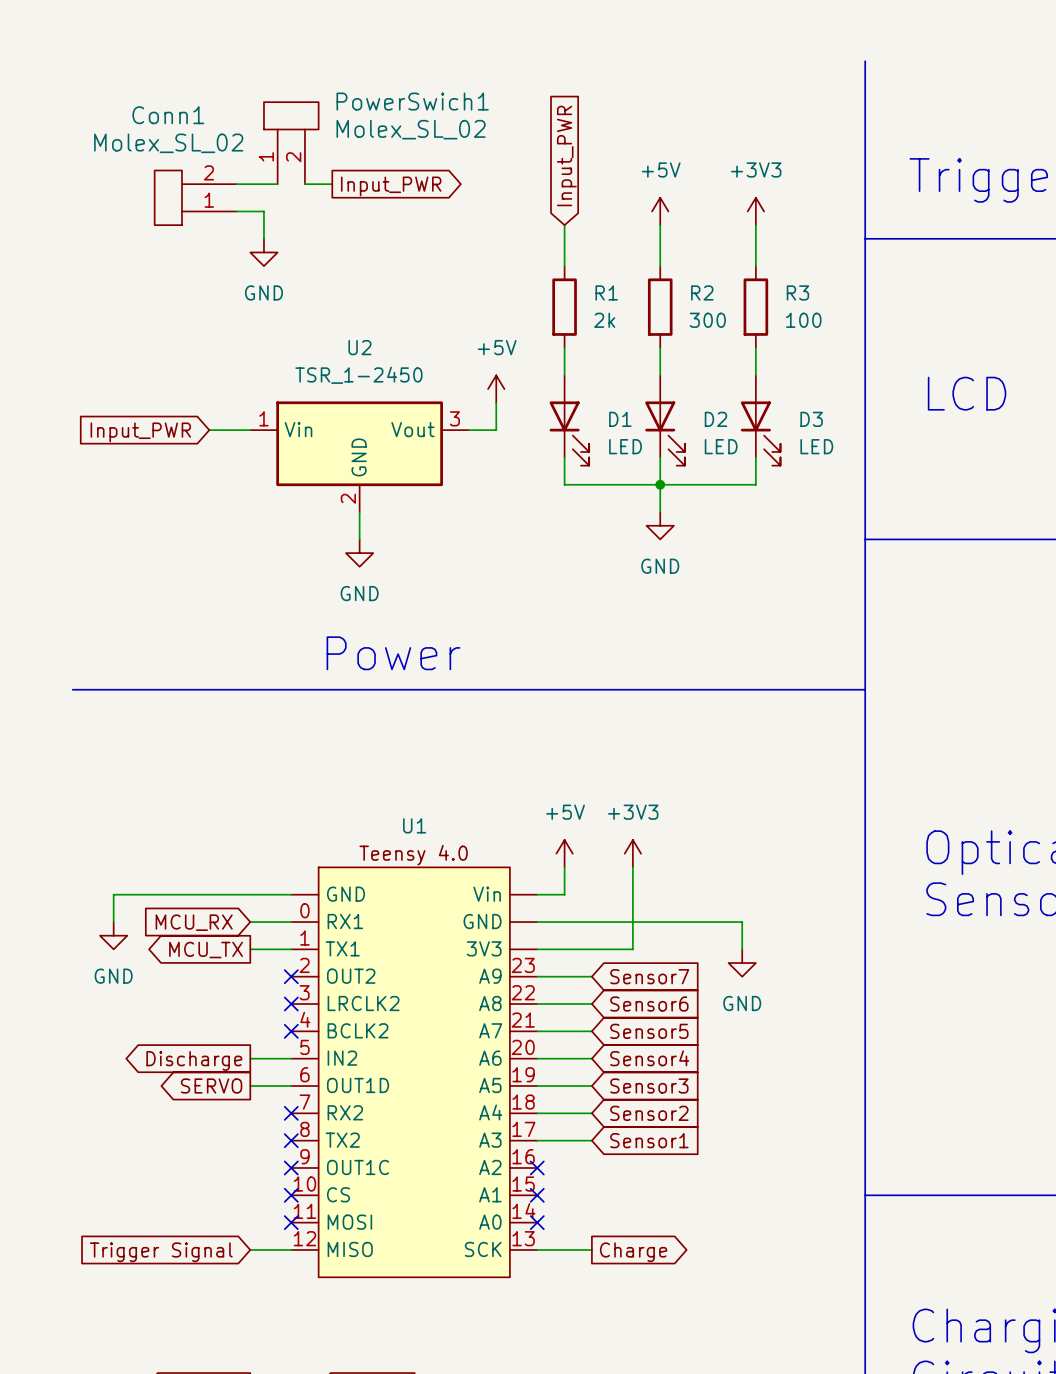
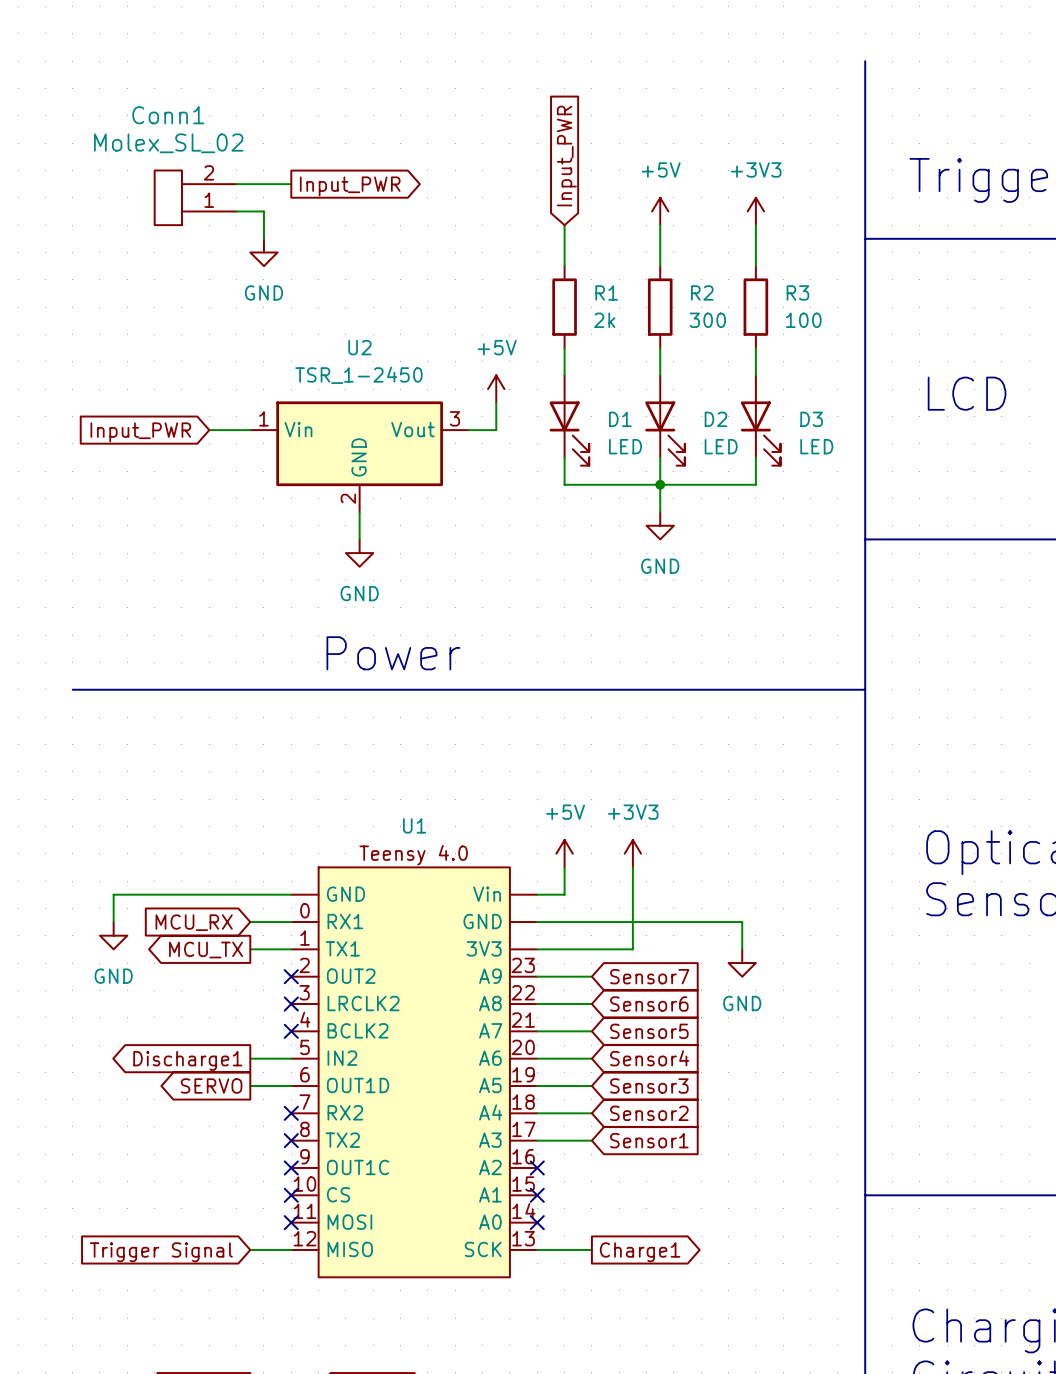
PowerSwich1: Molex_SL_02 (291, 143) -> none
wire: none -> (277, 184) (291, 184)
wire: (304, 184) (332, 184) -> none
global label position: Input_PWR (391, 186) -> Input_PWR (350, 186)
global label: Discharge (194, 1060) -> Discharge1 (187, 1060)
global label: Charge (633, 1252) -> Charge1 (640, 1252)

